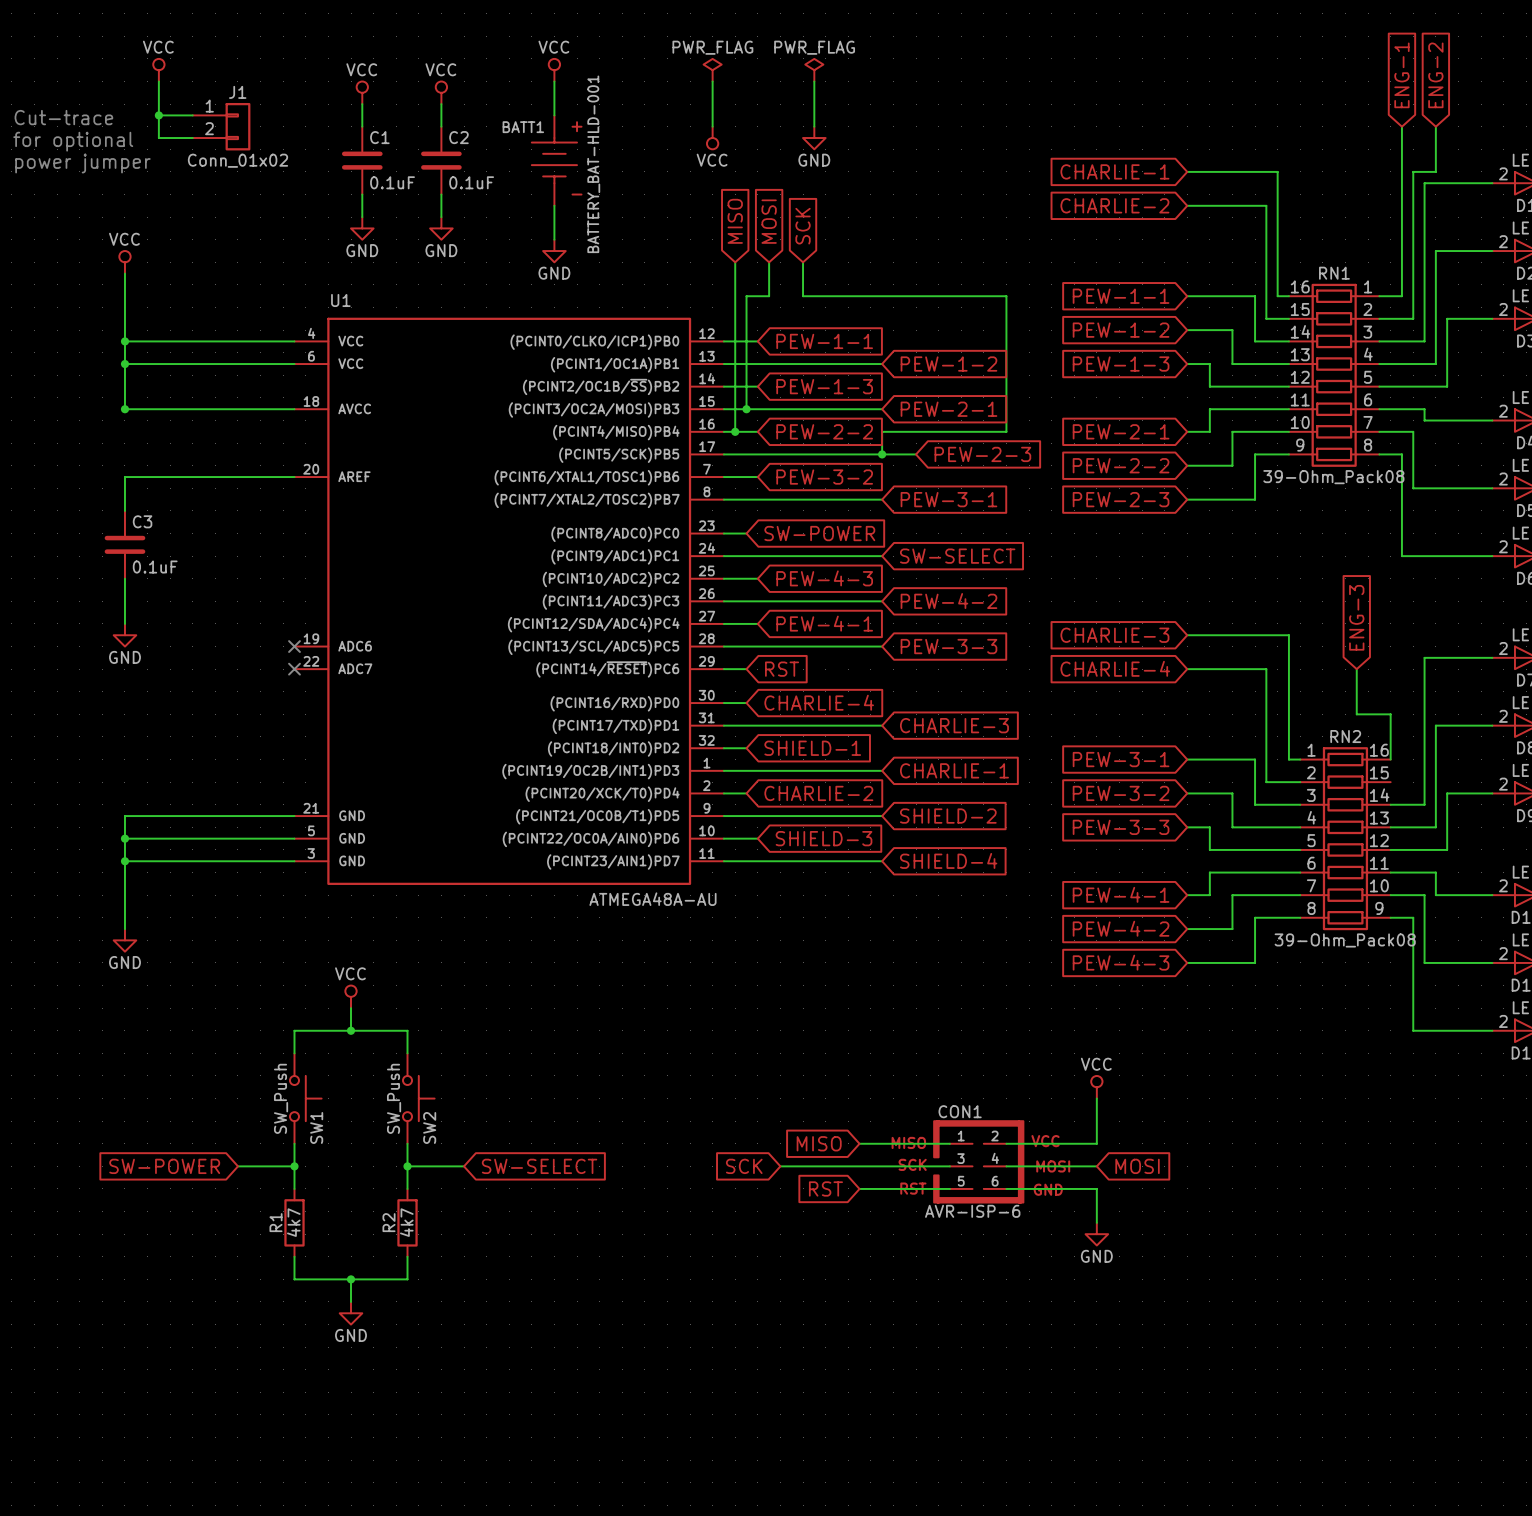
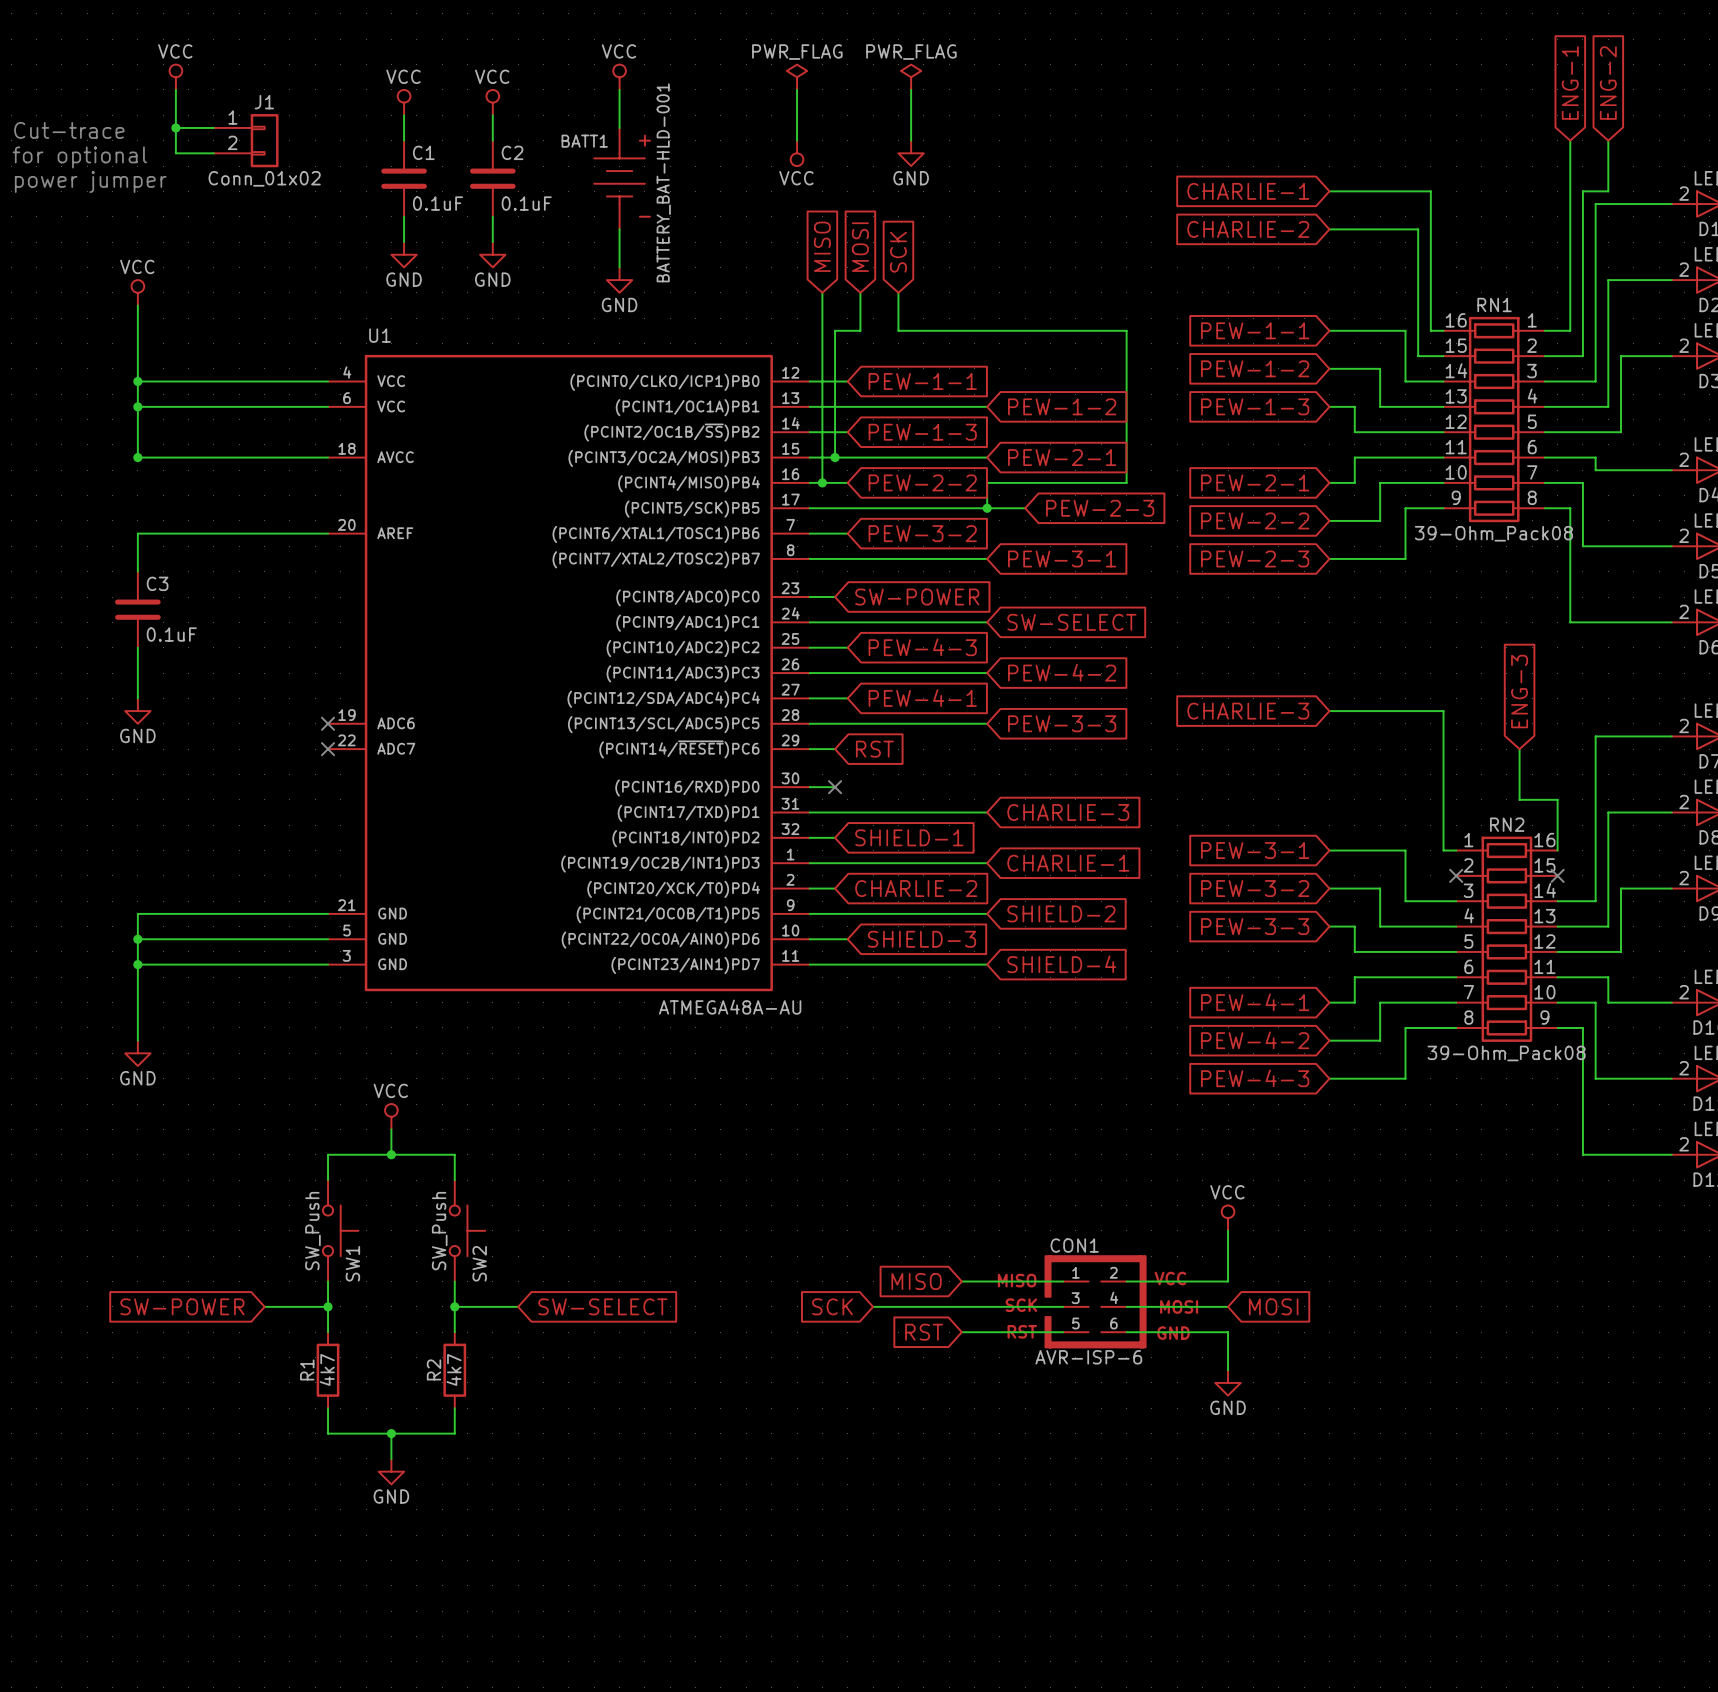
global label: CHARLIE-4 (1115, 668) -> none
wire: (1187, 669) (1266, 669) (1266, 782) (1300, 782) -> none
global label: CHARLIE-4 (819, 702) -> none
no-connect mark: none -> (835, 787)
no-connect mark: none -> (1456, 875)
no-connect mark: none -> (1557, 875)

